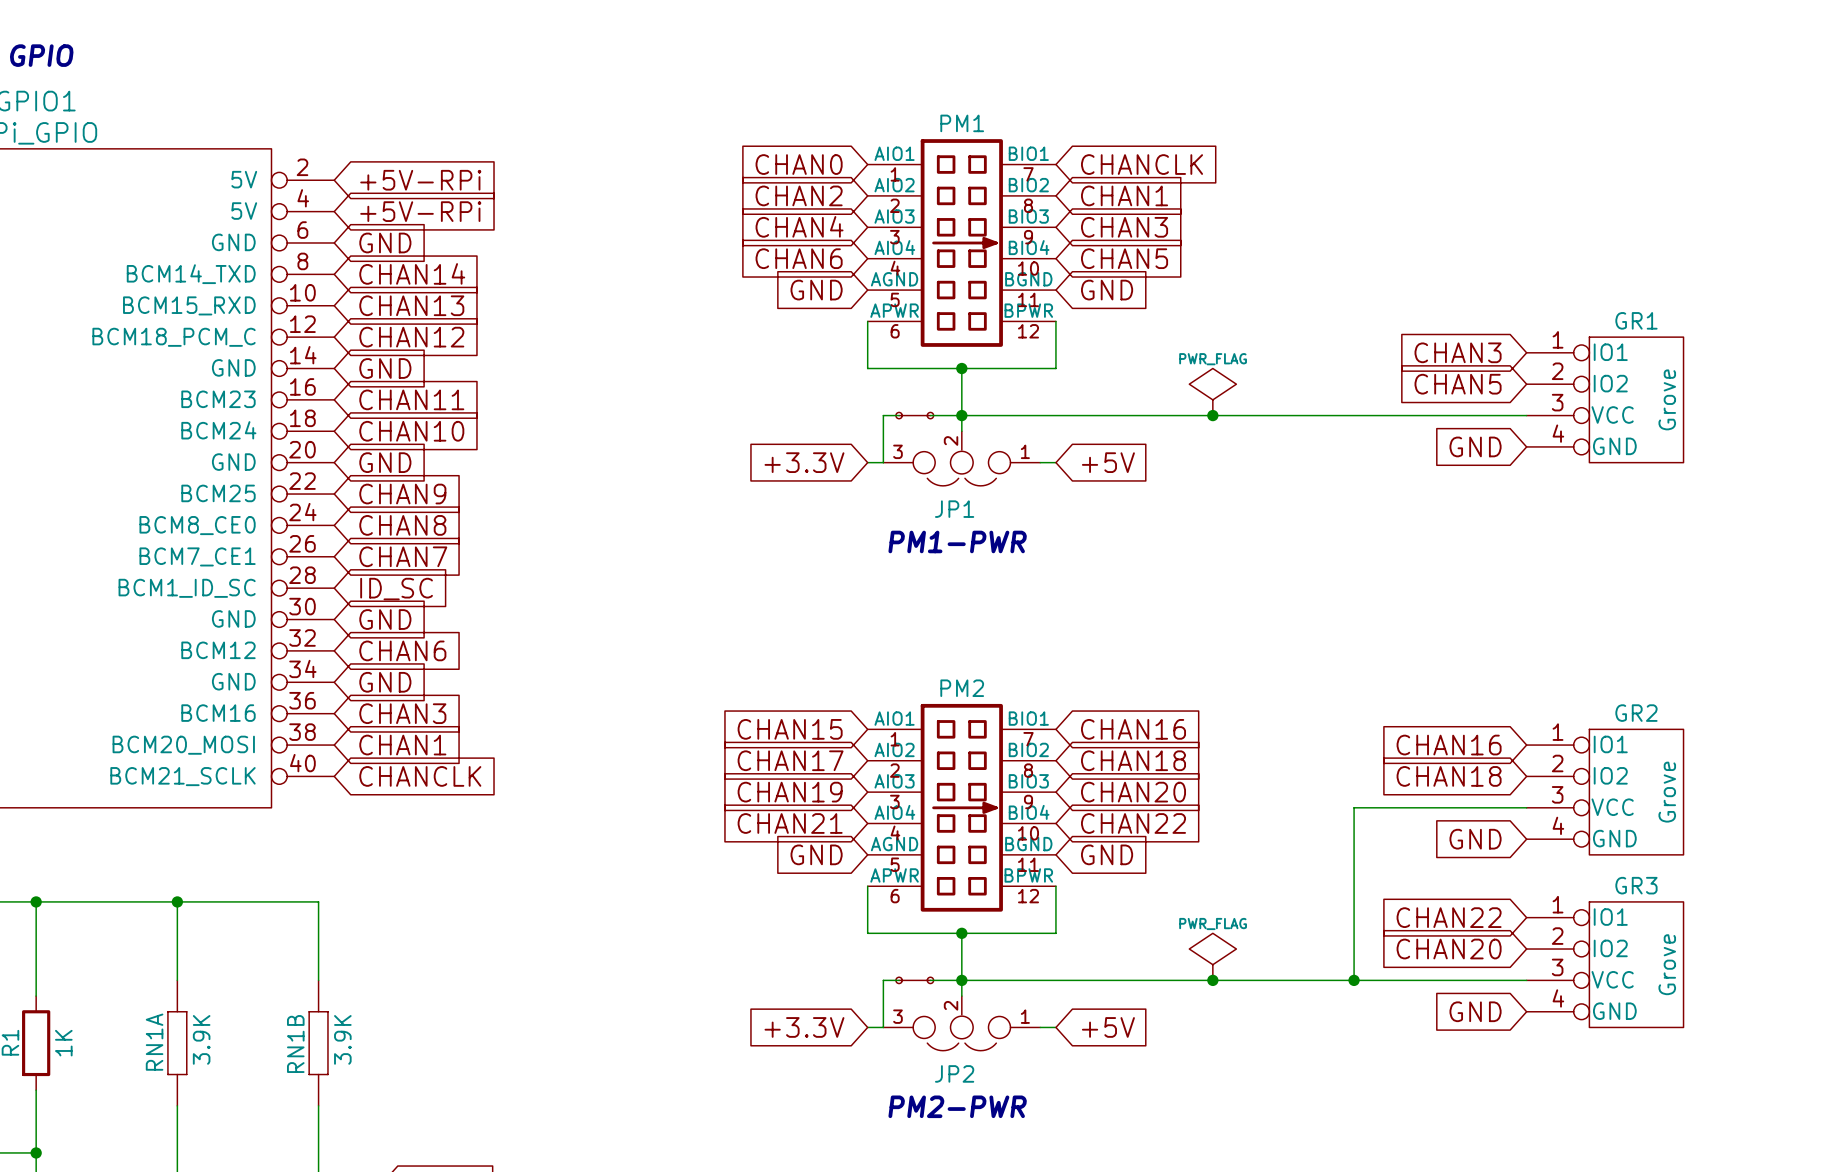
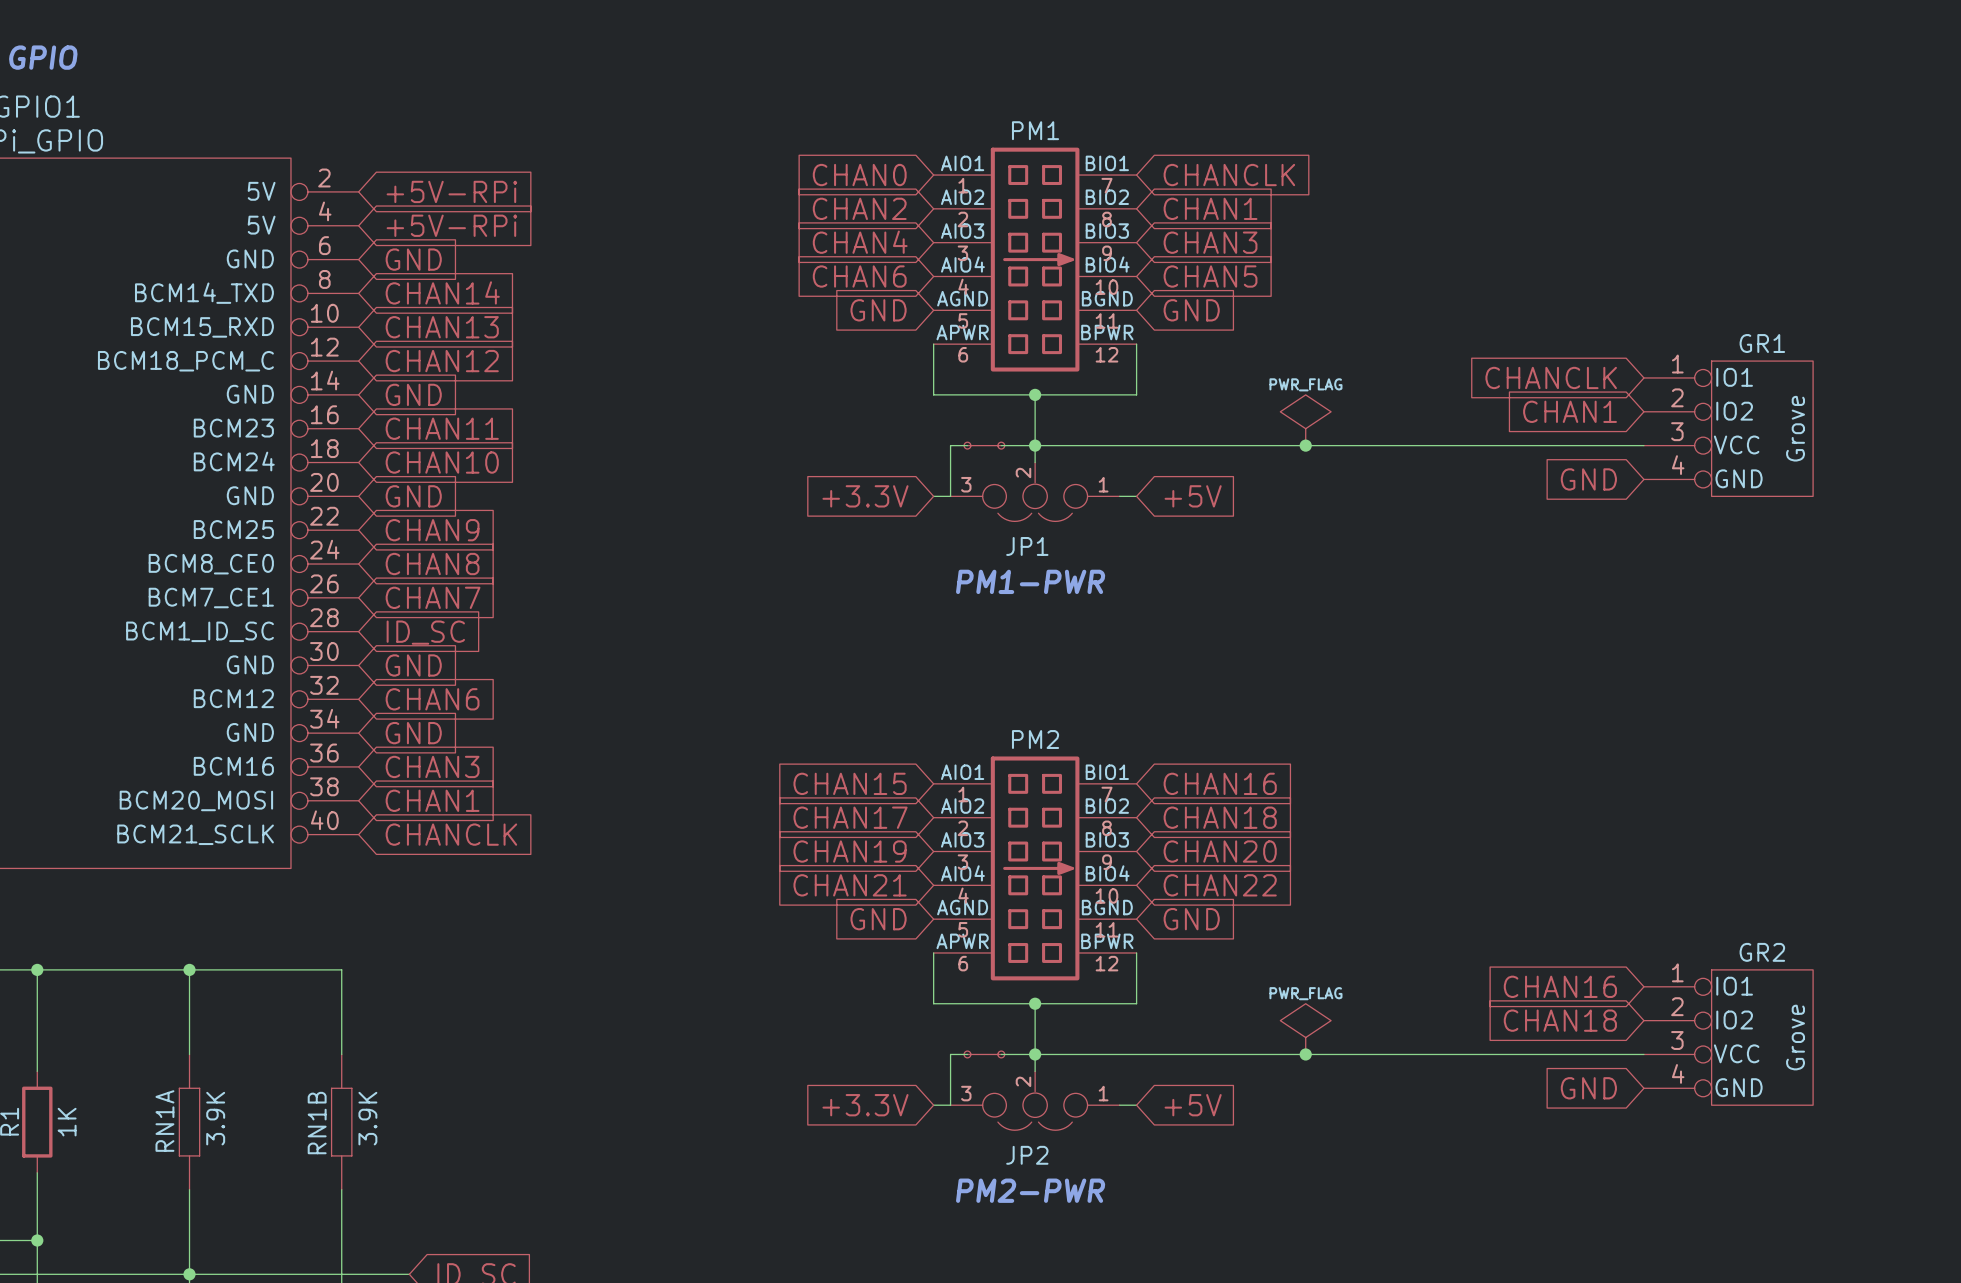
global label: CHAN3 (1458, 352) -> CHANCLK (1551, 377)
global label: CHAN5 (1458, 384) -> CHAN1 (1570, 411)
global label: CHAN16 (1449, 745) -> none
global label: CHAN18 (1449, 776) -> none
GR2: Grove (1605, 792) -> none
wire: (1526, 807) (1354, 807) (1354, 980) -> none
global label: GND (1475, 839) -> none
GR3 name: GR3 (1636, 885) -> GR2 (1762, 952)
global label: CHAN22 (1449, 917) -> CHAN16 (1560, 986)
global label: CHAN20 (1449, 949) -> CHAN18 (1560, 1020)
junction: (1354, 980) -> none

